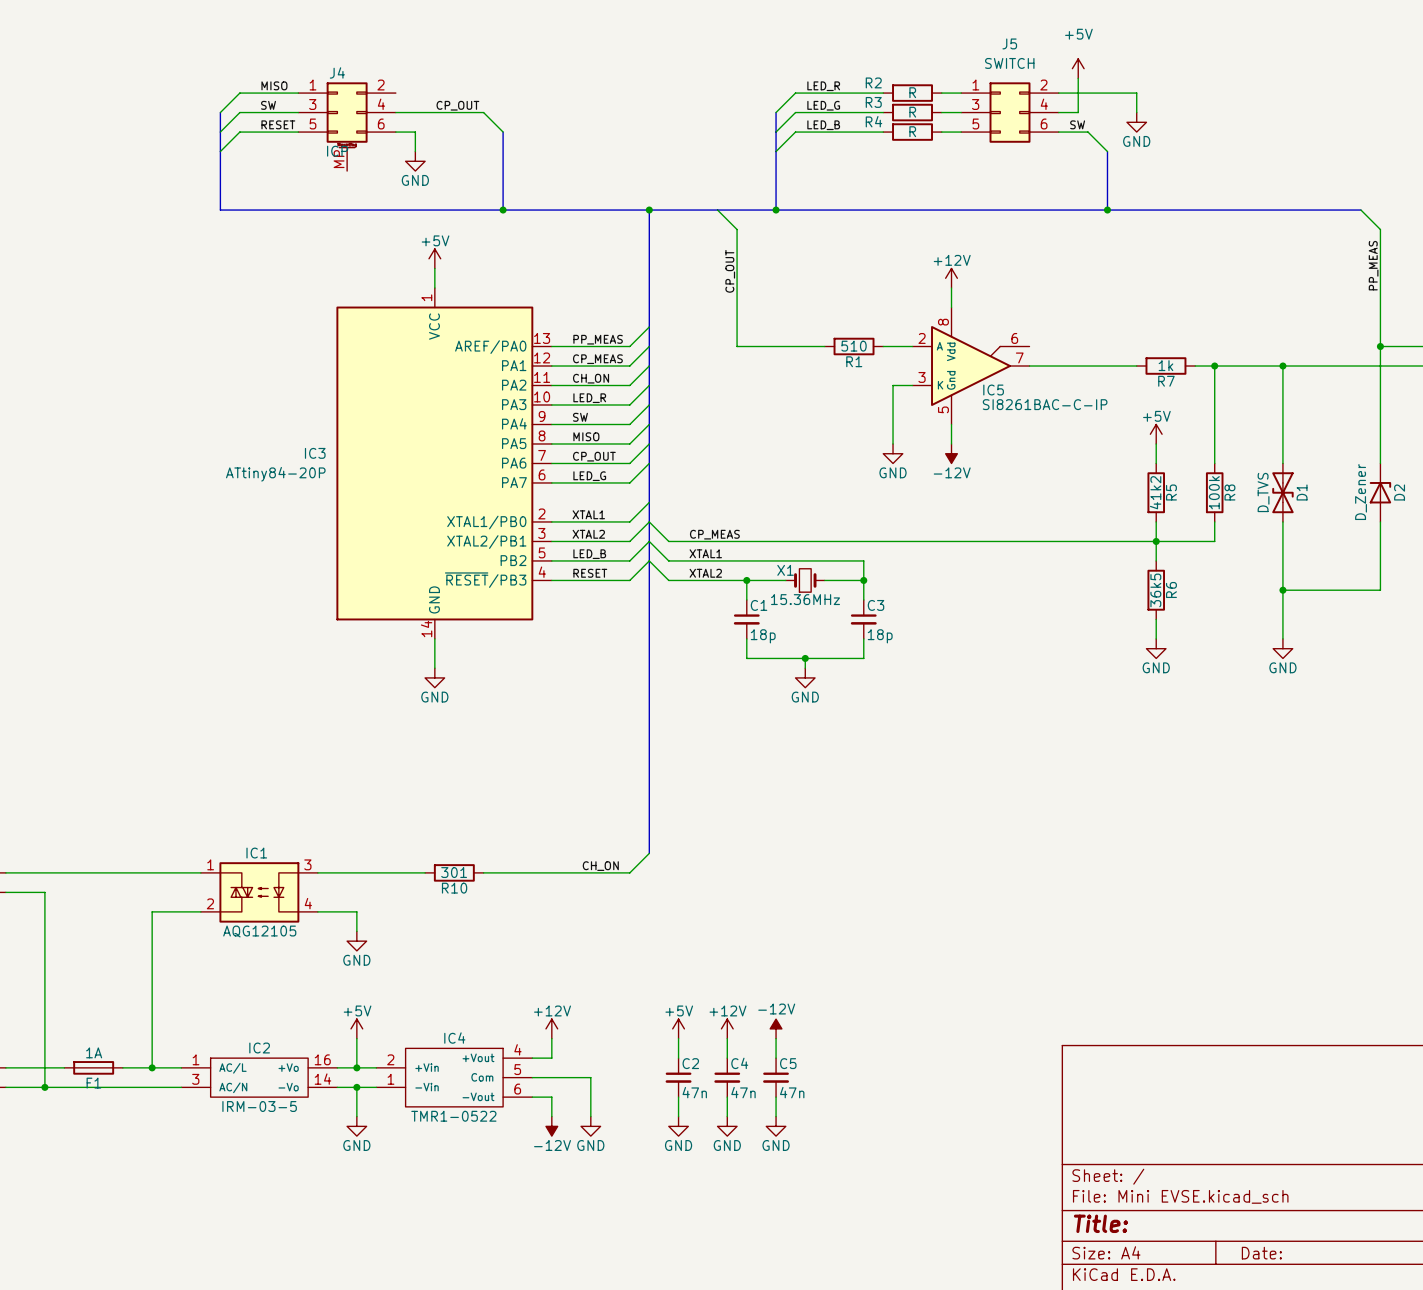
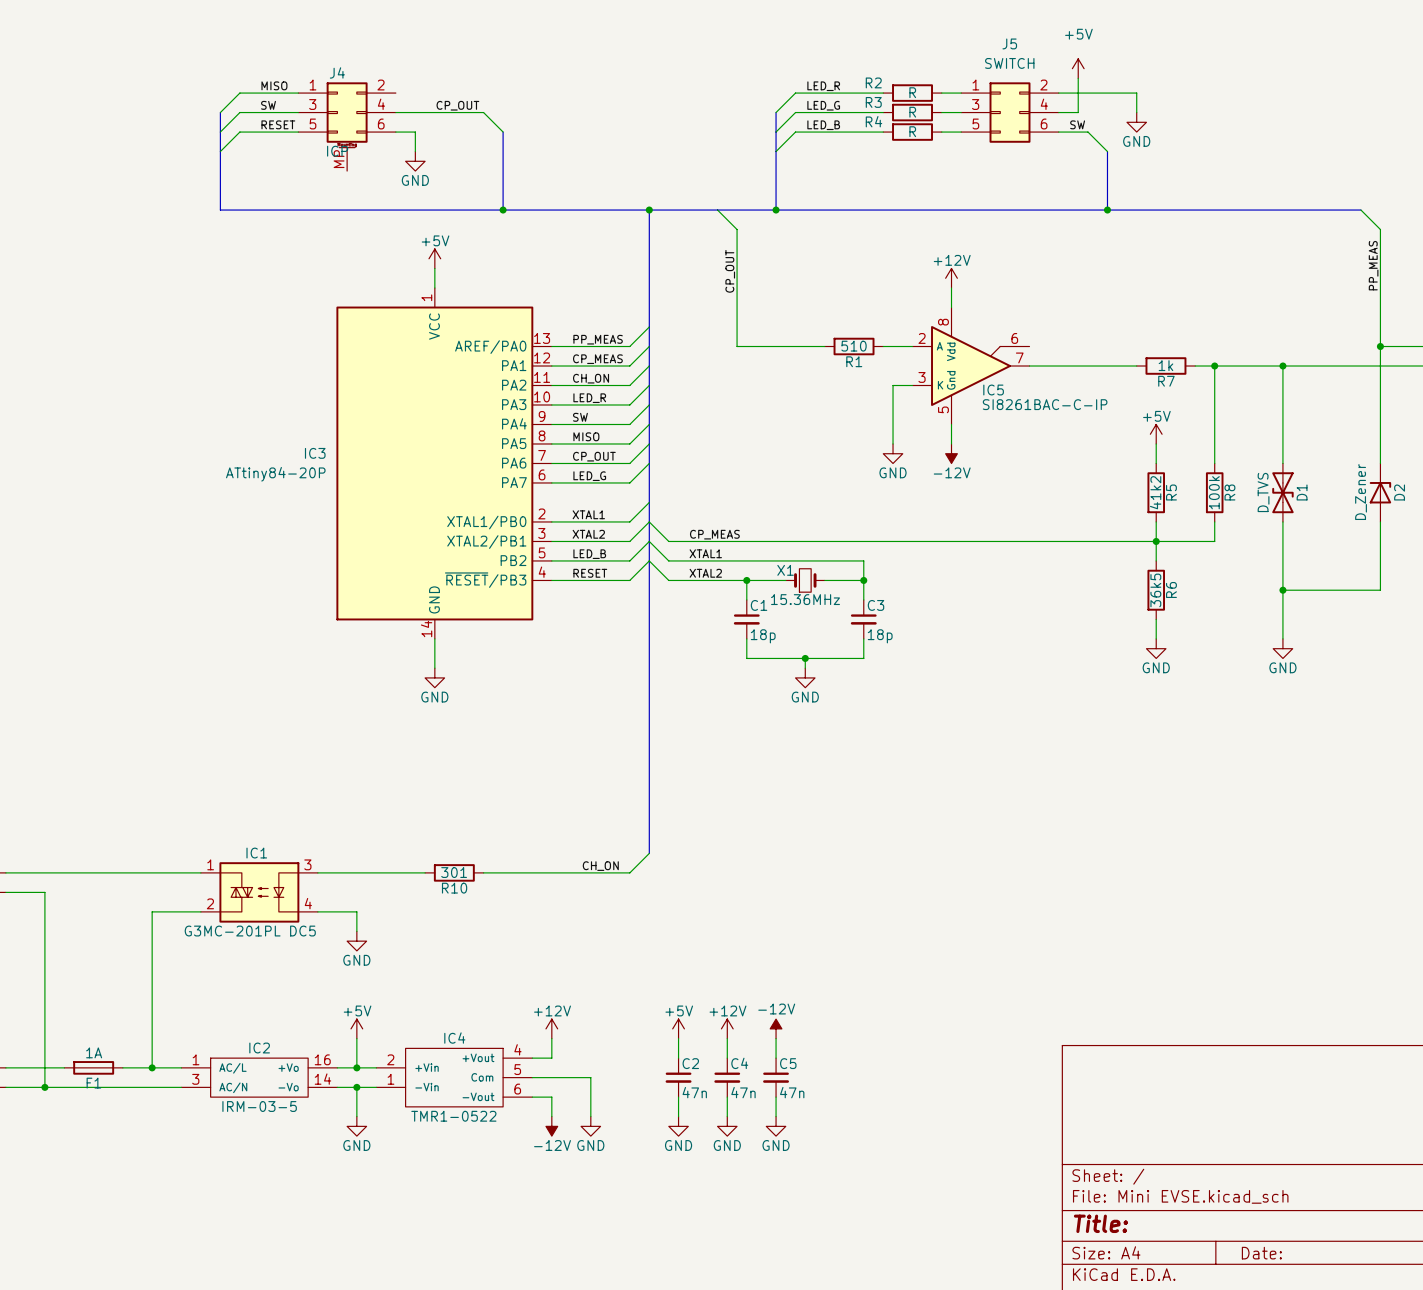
IC1 value: AQG12105 (259, 931) -> G3MC-201PL DC5 (250, 931)

